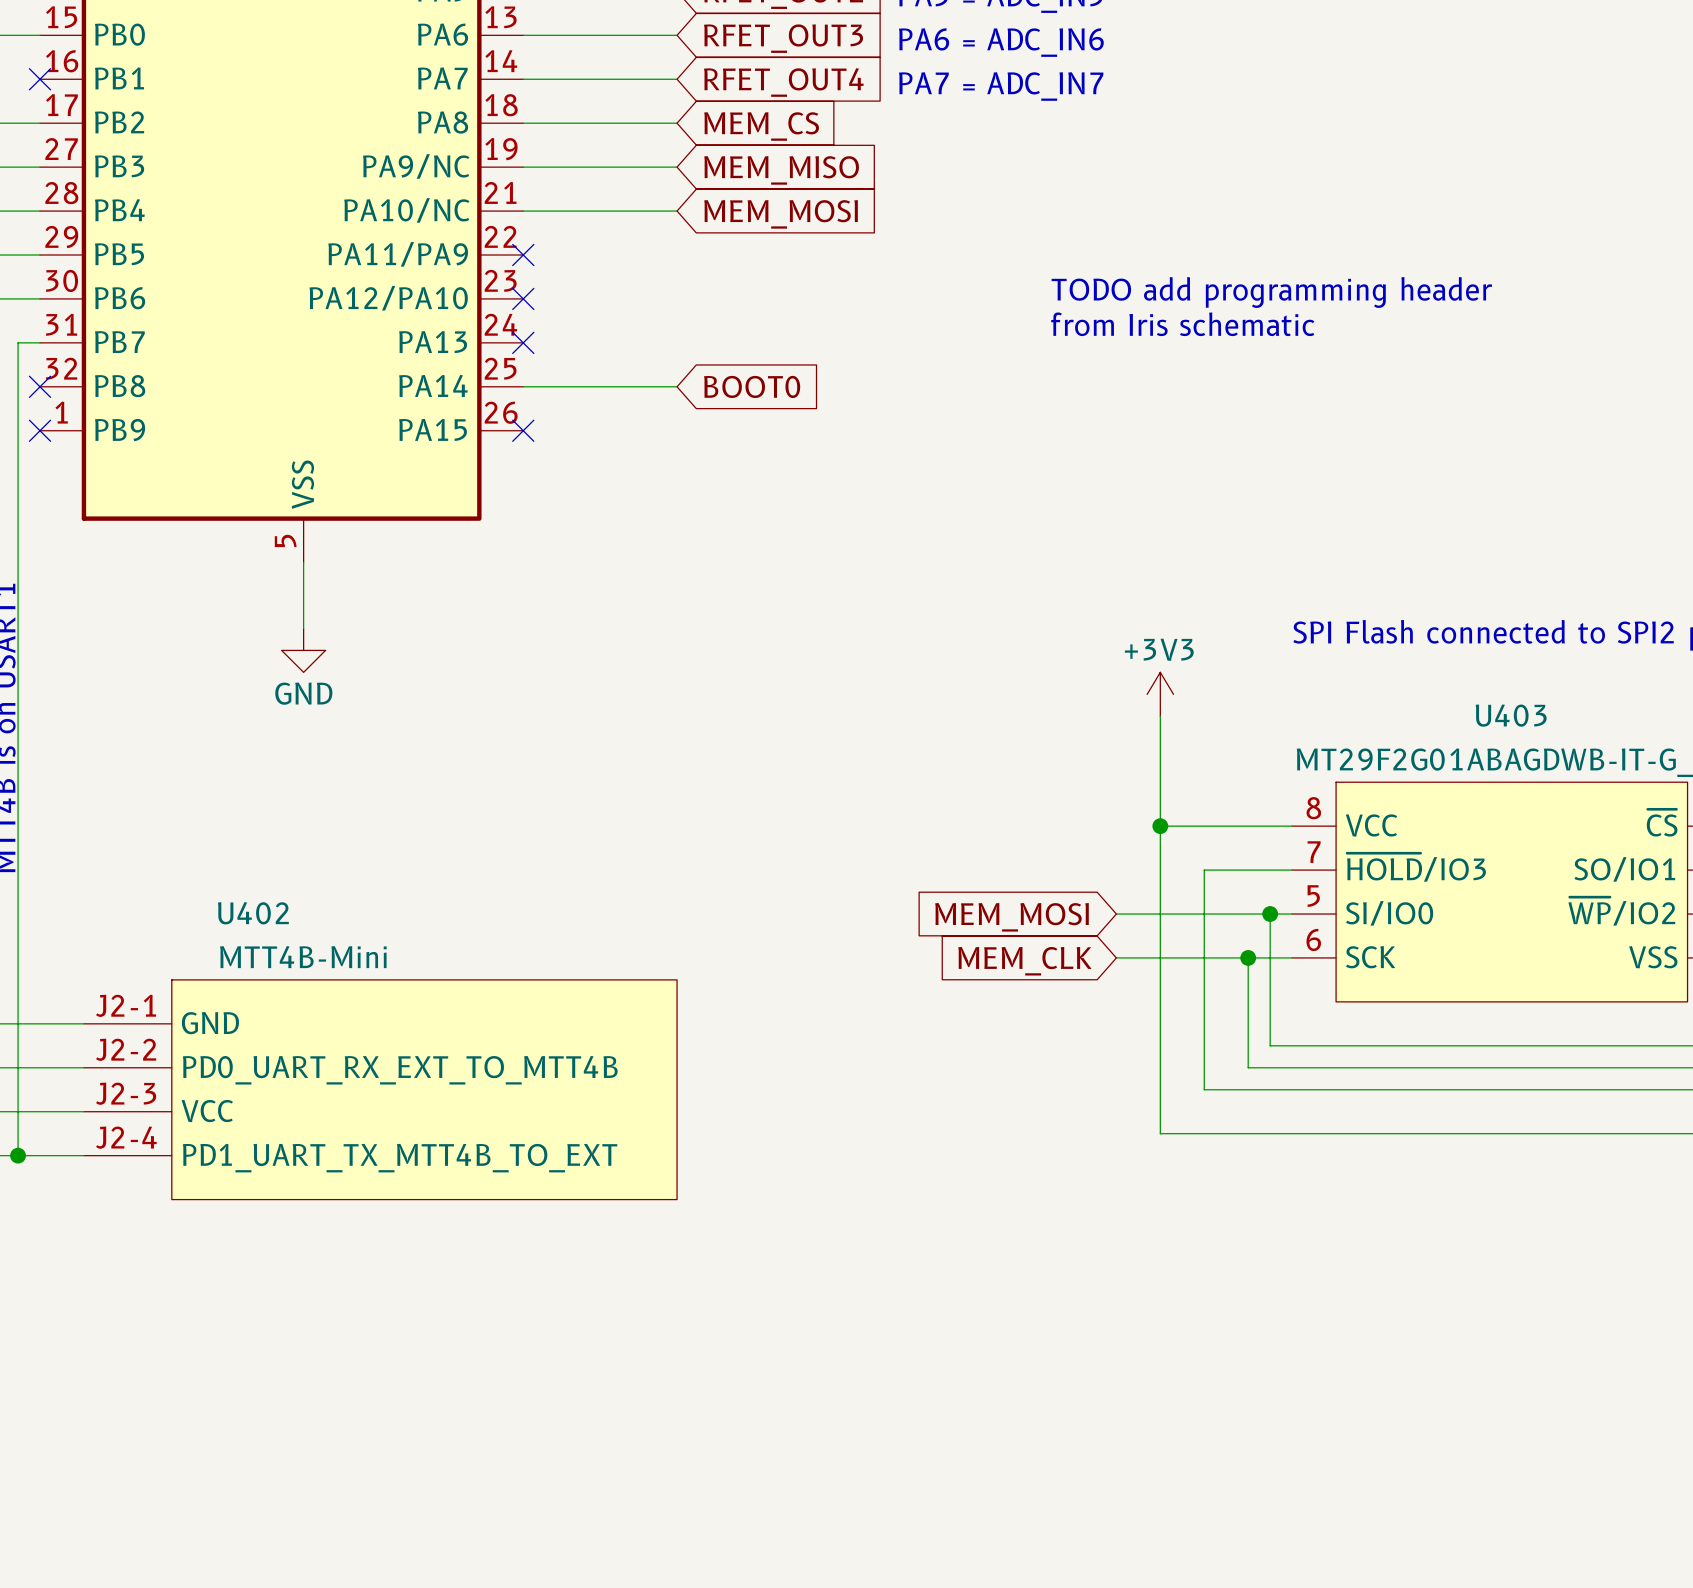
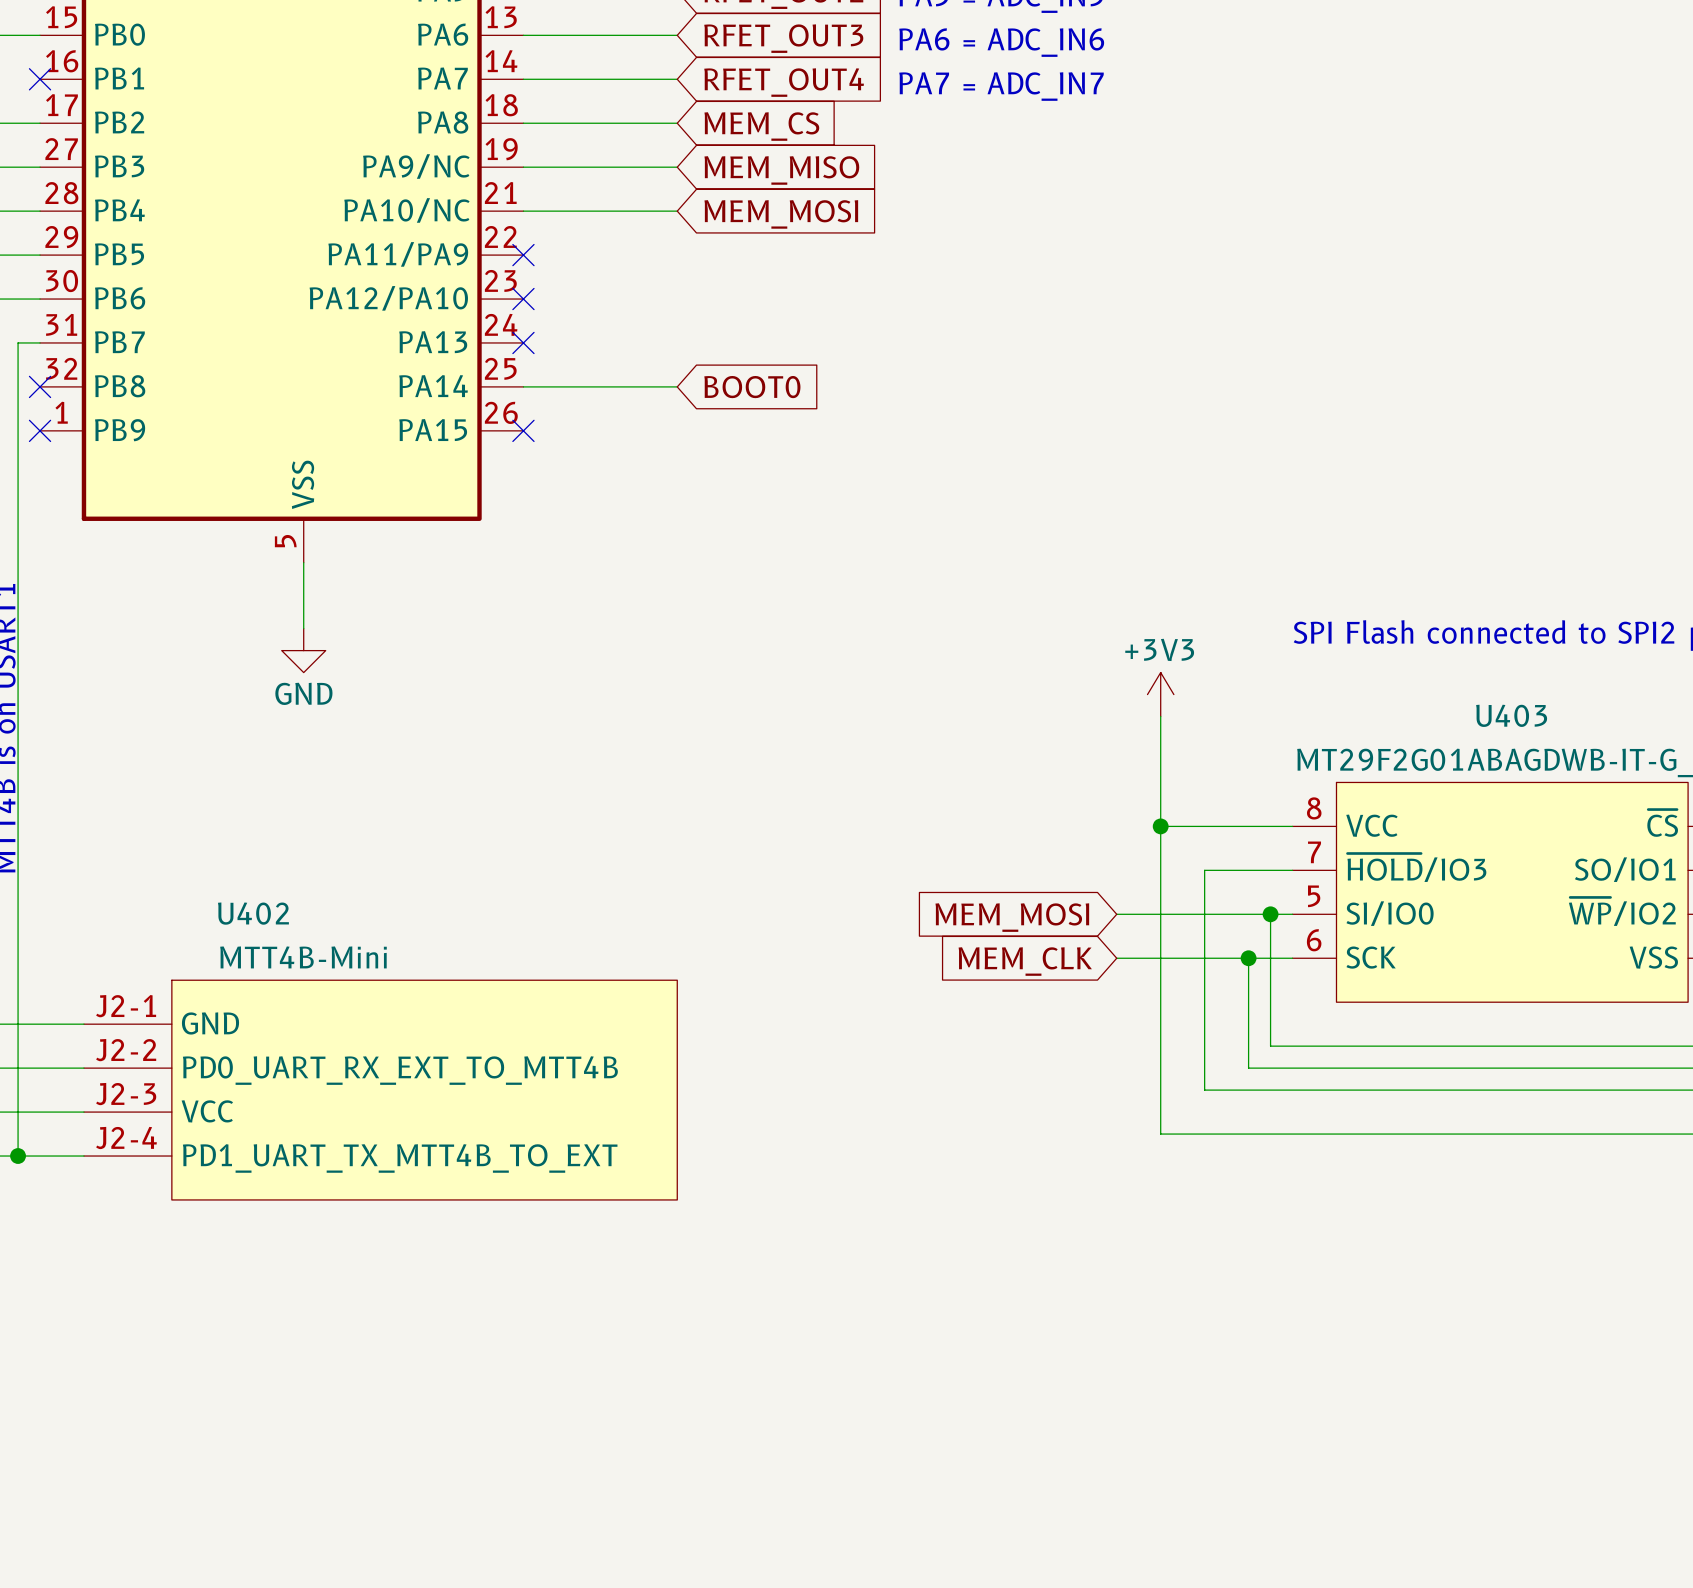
text: TODO add programming header (1271, 292) -> none
text: from Iris schematic (1182, 324) -> none

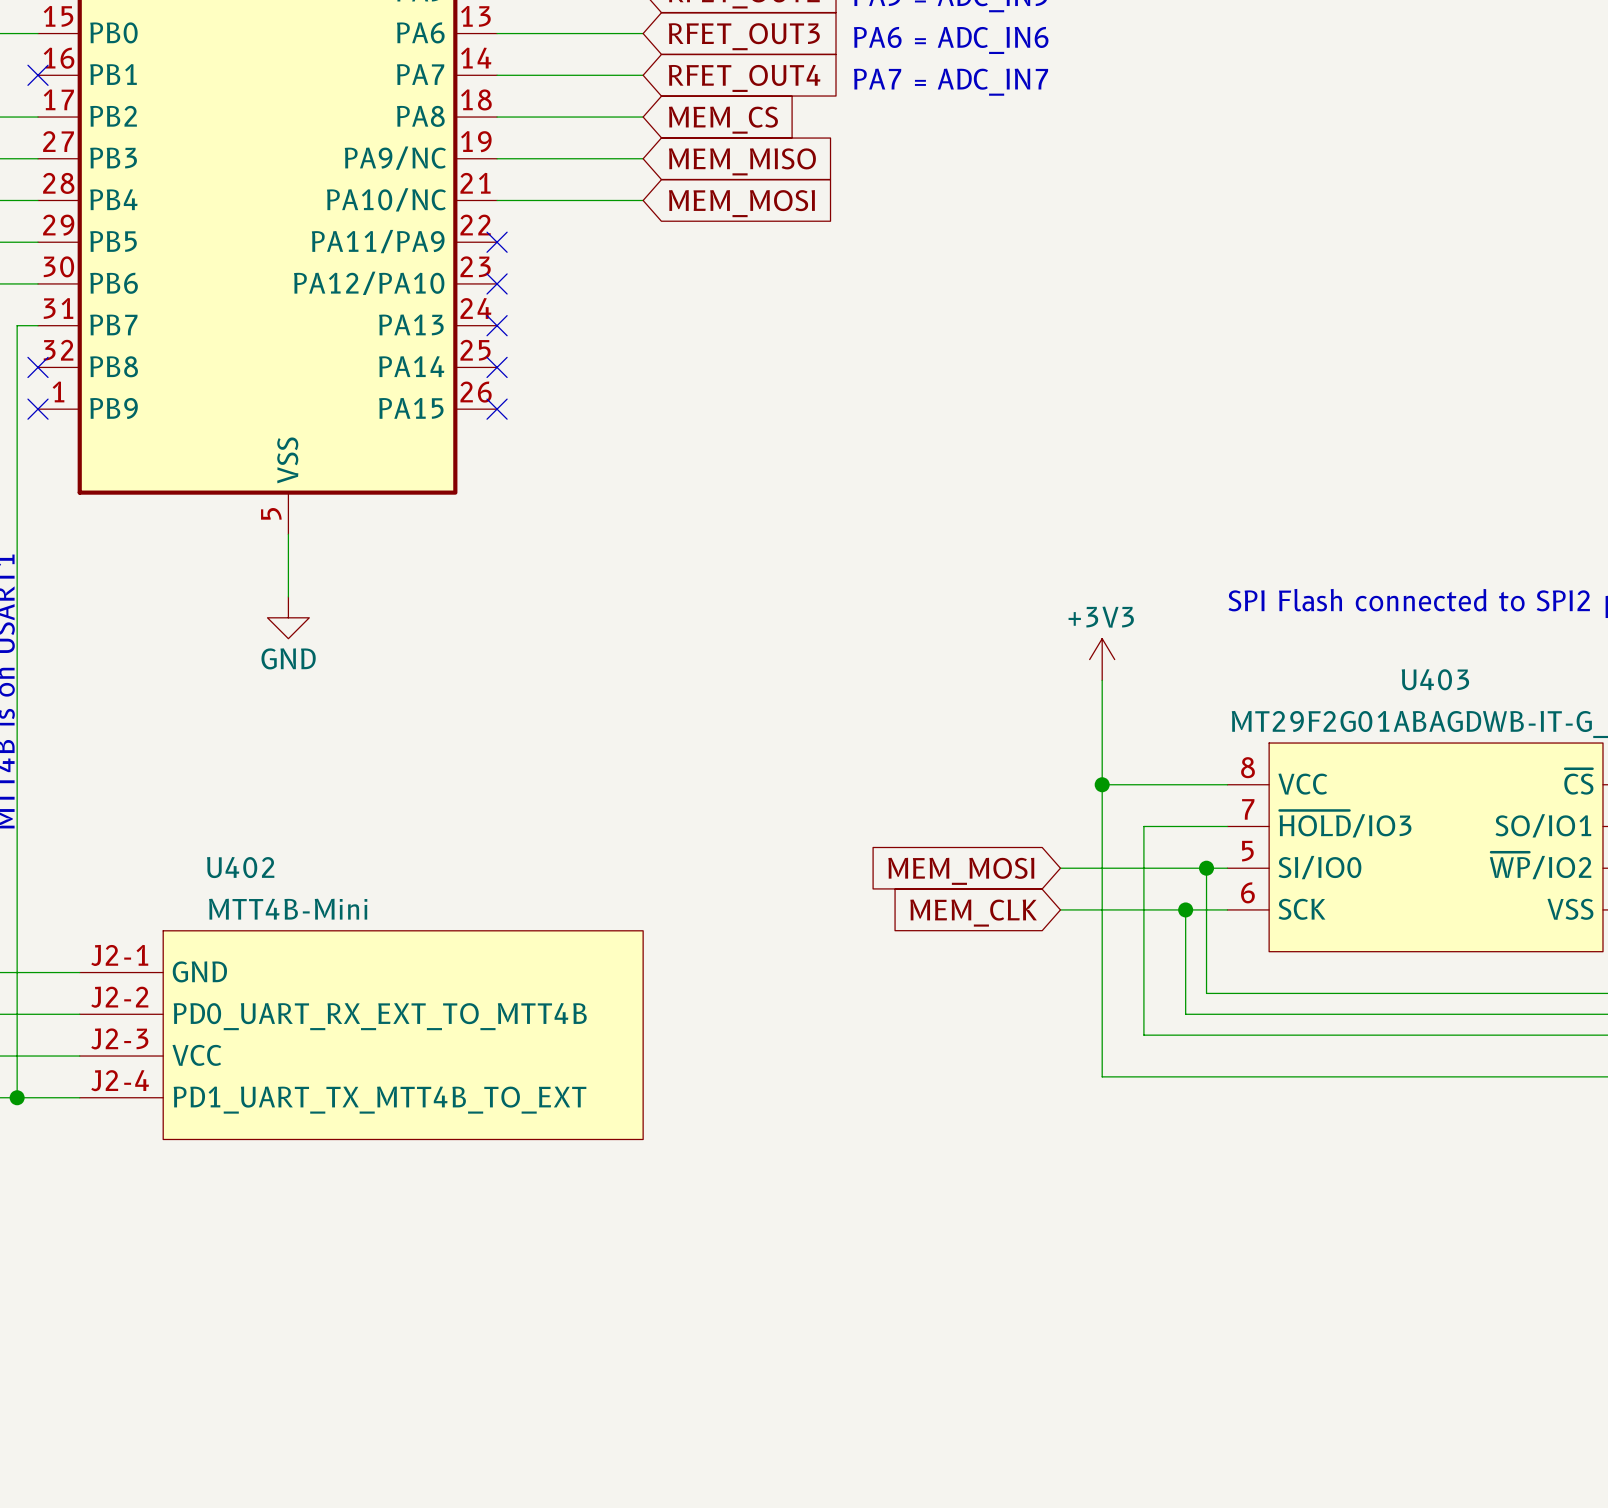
wire: (523, 386) (677, 386) -> none
no-connect mark: none -> (497, 367)
global label: BOOT0 (752, 387) -> none

